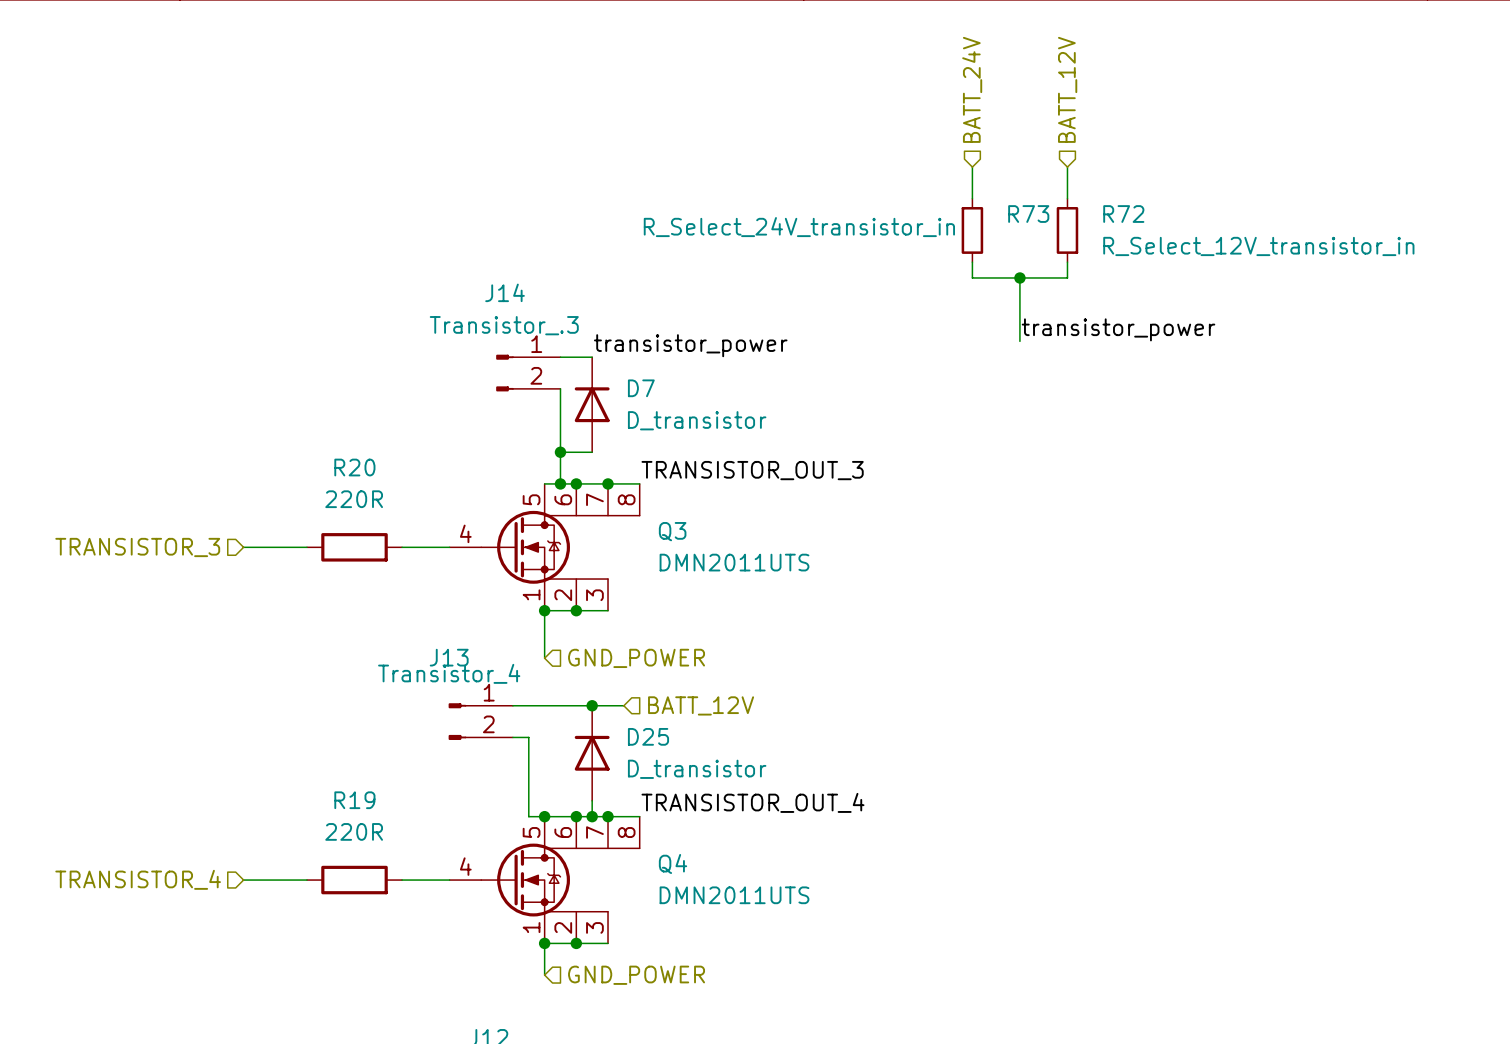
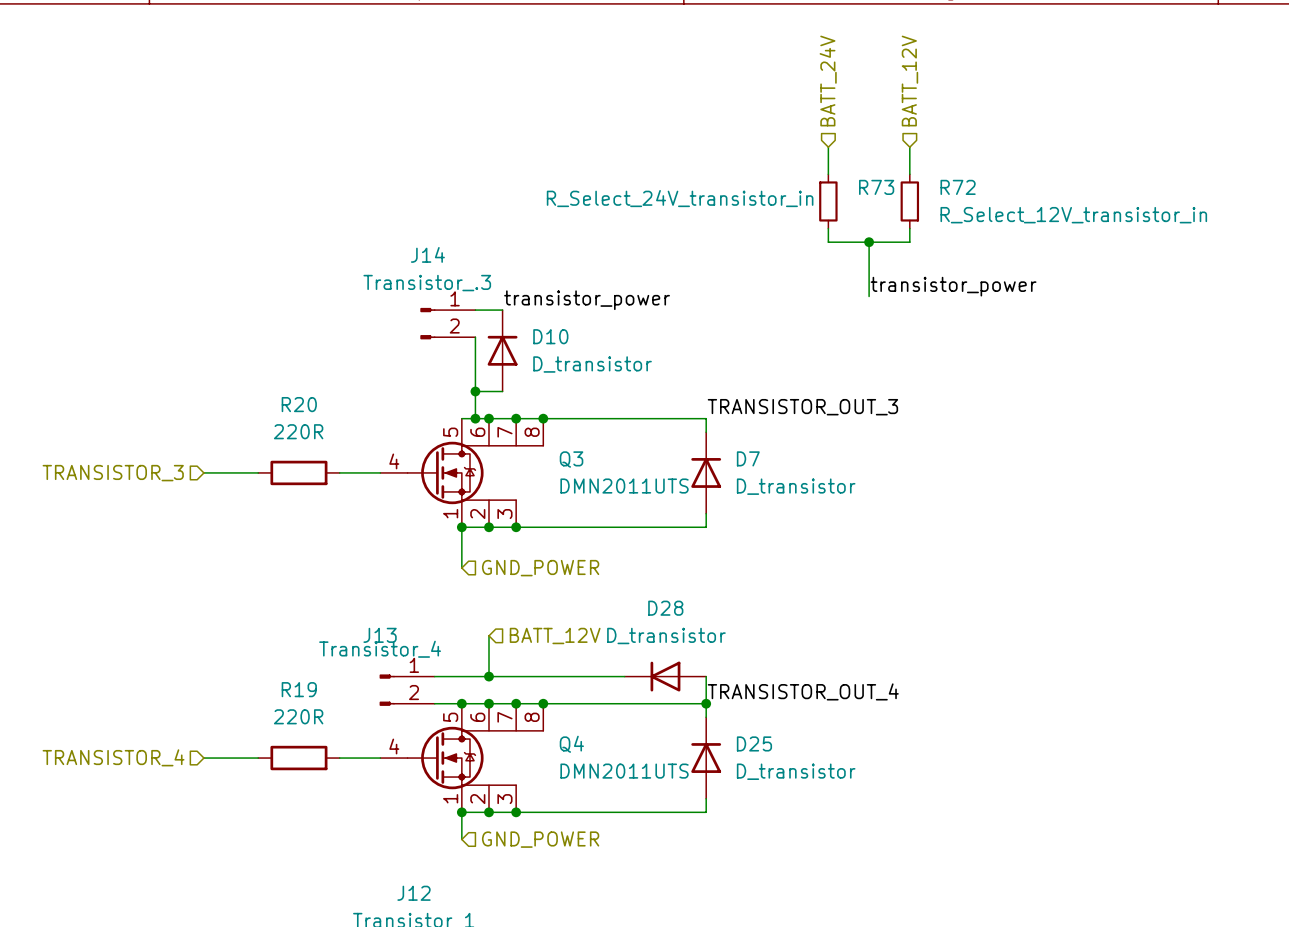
D7 name: D7 (641, 388) -> D10 (550, 336)
label position: TRANSISTOR_OUT_3 (752, 470) -> TRANSISTOR_OUT_3 (802, 407)
wire: none -> (543, 418) (706, 418) (706, 432)
junction: none -> (543, 418)
D7: none -> D_transistor (706, 472)
wire: none -> (706, 513) (706, 527) (516, 527)
junction: none -> (516, 527)
wire: (512, 705) (623, 705) -> none
junction: (592, 705) -> none
hierarchical label position: BATT_12V (701, 705) -> BATT_12V (555, 635)
J13 position: (480, 721) -> (407, 690)
wire: (512, 737) (528, 737) (528, 816) -> (434, 703) (448, 703)
wire: none -> (489, 635) (489, 676)
D25 position: (592, 753) -> (706, 758)
wire: none -> (434, 676) (624, 676)
junction: none -> (489, 676)
D28: none -> D_transistor (665, 676)
wire: none -> (706, 676) (706, 717)
wire: (592, 800) (592, 816) -> none
label position: TRANSISTOR_OUT_4 (752, 802) -> TRANSISTOR_OUT_4 (803, 691)
junction: (592, 816) -> none
wire: none -> (543, 703) (706, 703)
junction: none -> (543, 703)
junction: none -> (706, 703)
wire: none -> (706, 798) (706, 812) (516, 812)
junction: none -> (516, 812)

